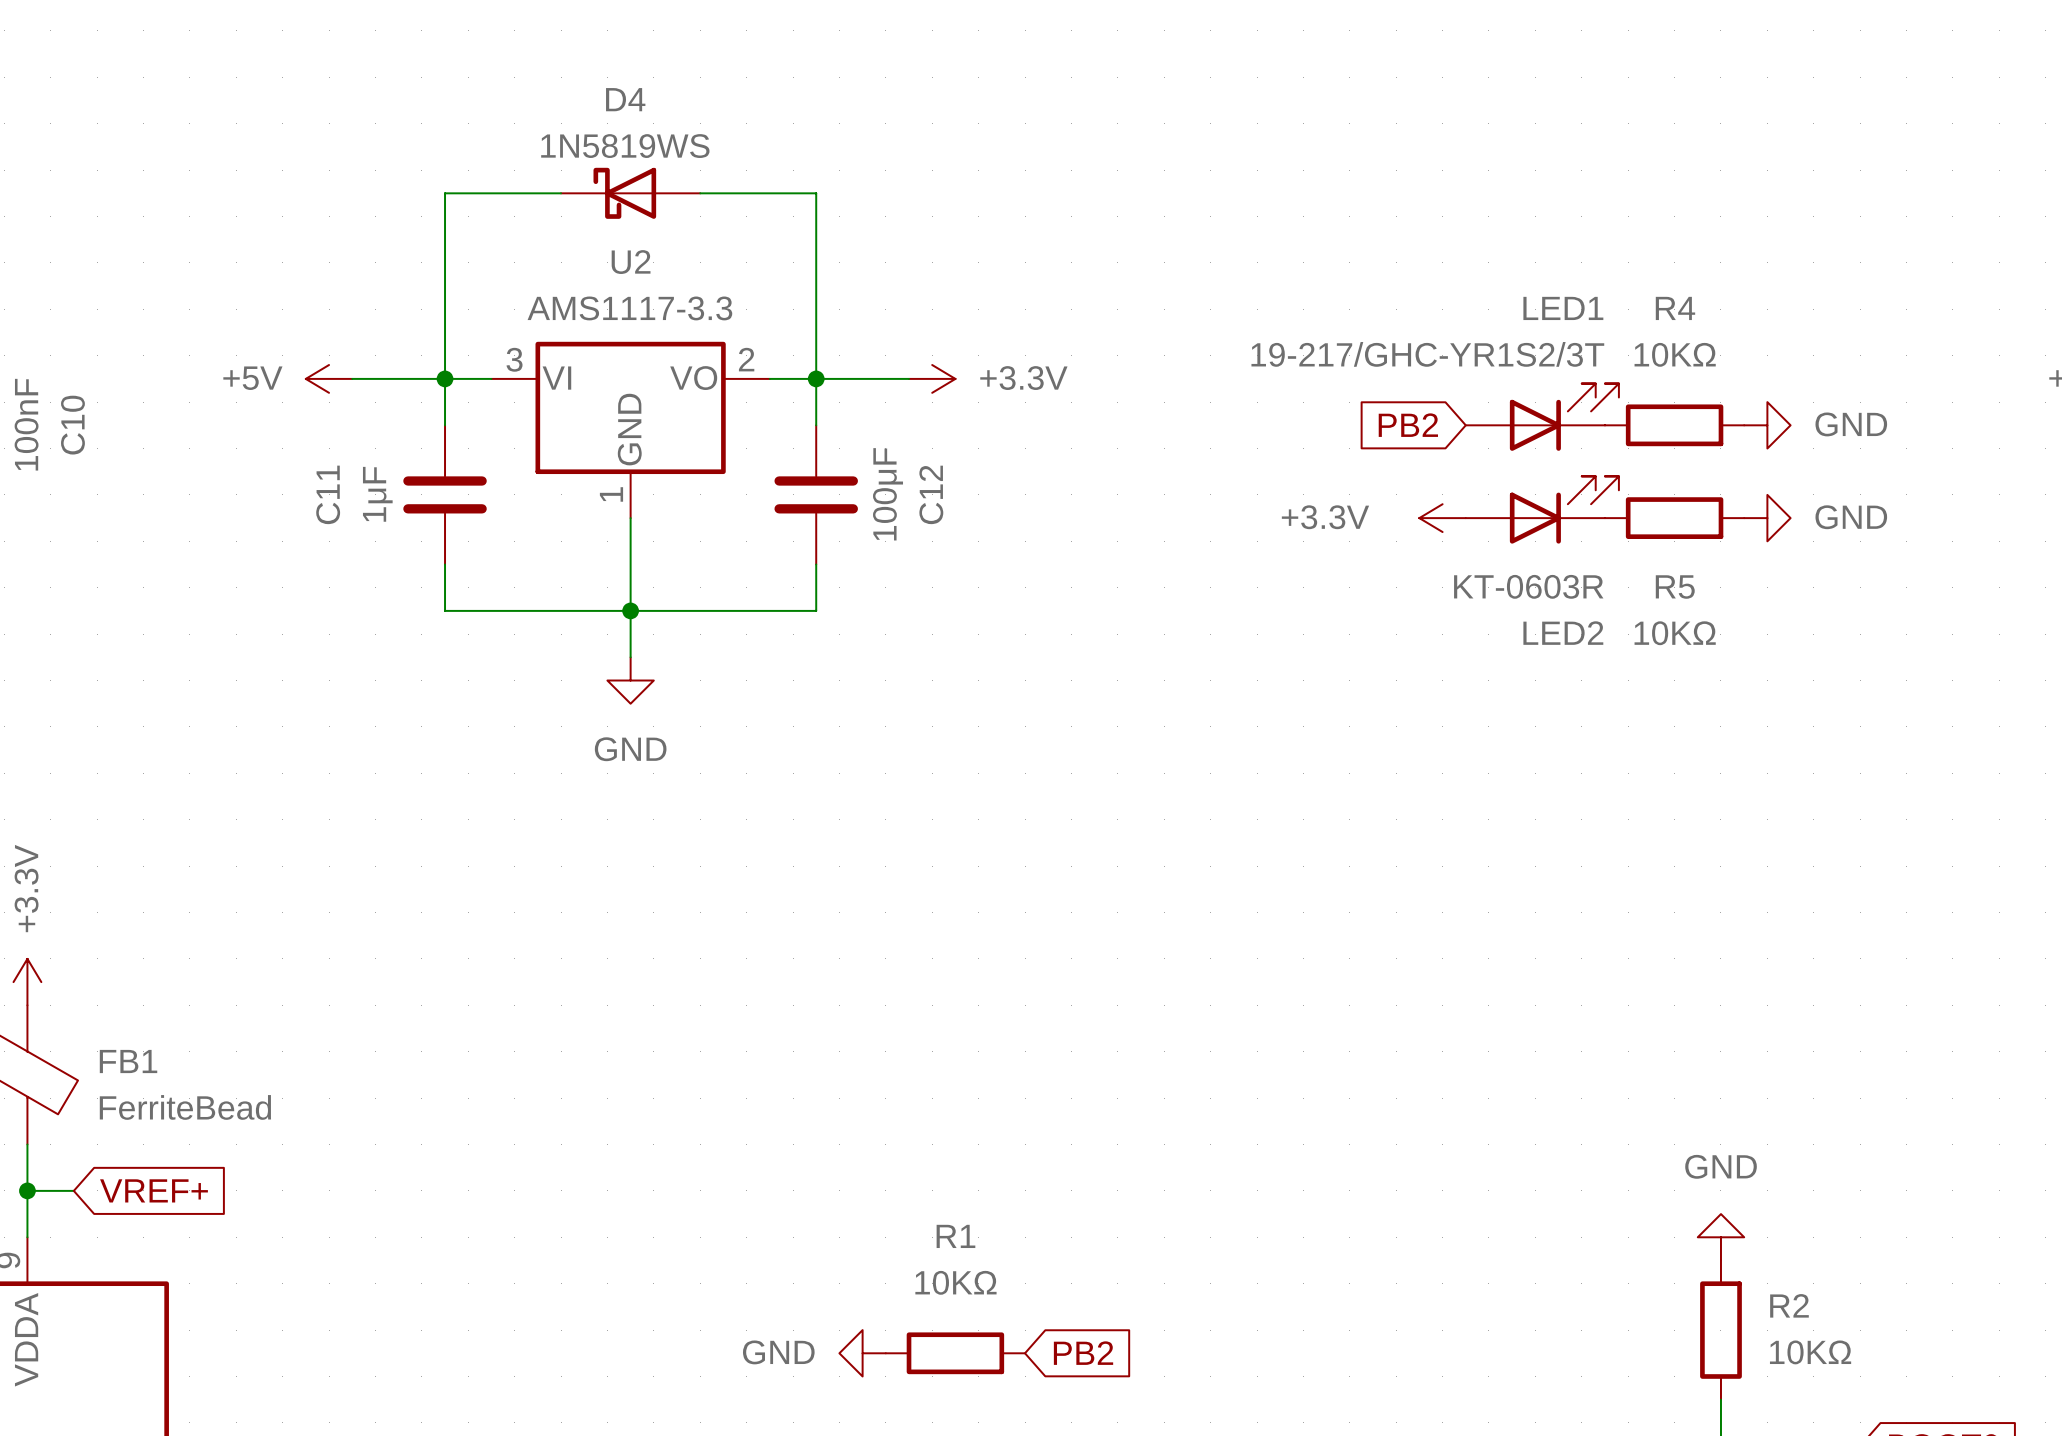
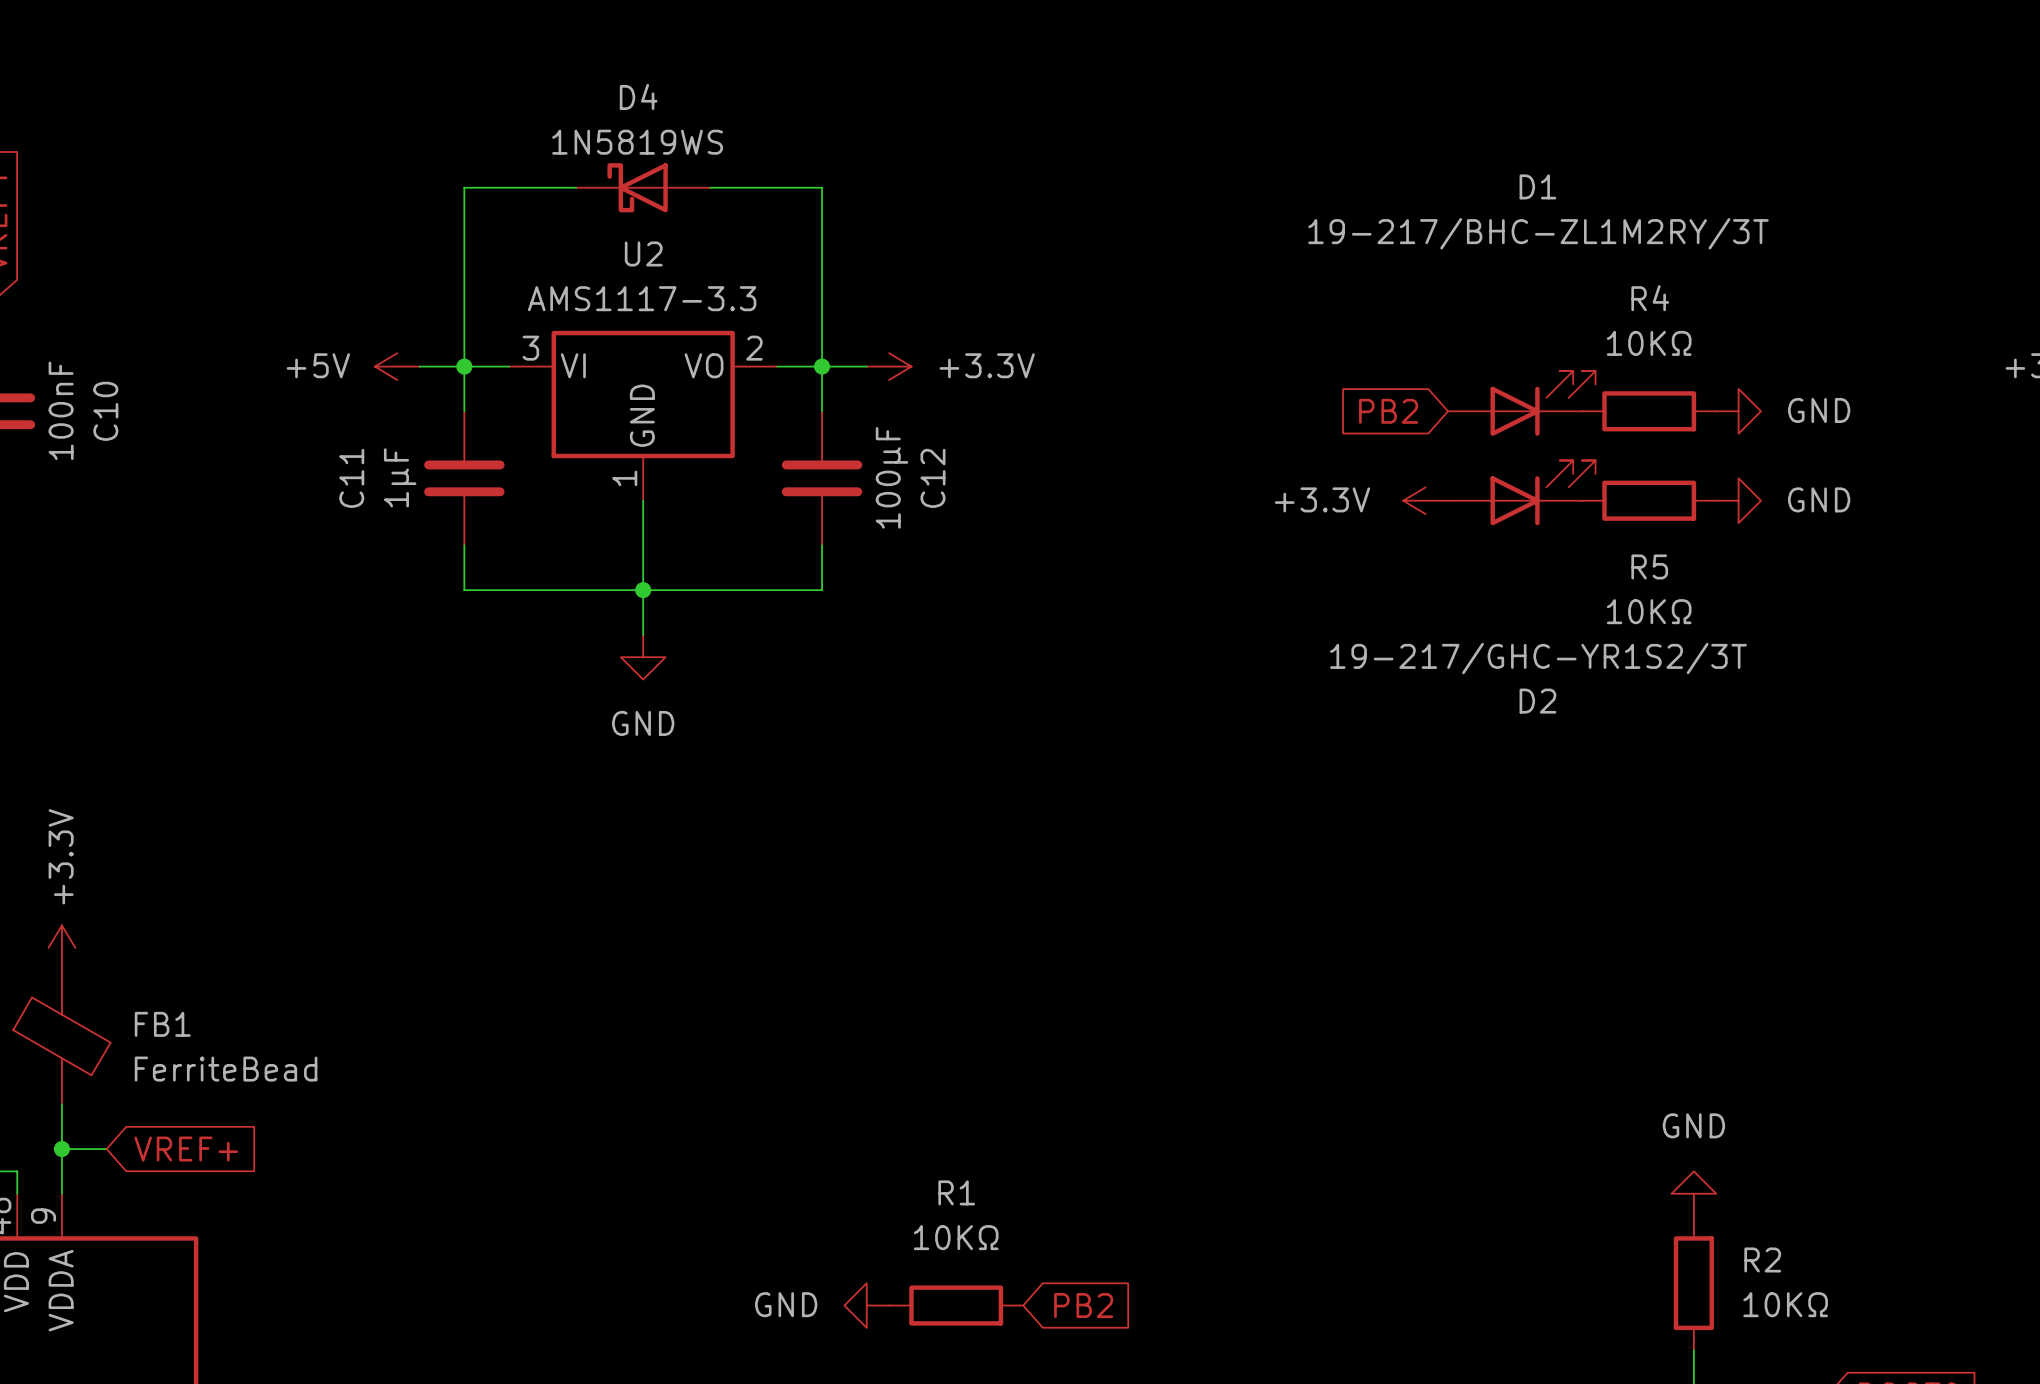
LED1 name: LED1 (1563, 308) -> D1 (1537, 186)
LED1 value: 19-217/GHC-YR1S2/3T (1427, 354) -> 19-217/BHC-ZL1M2RY/3T (1538, 233)
power symbol position: +5V (329, 378) -> +5V (397, 366)
power symbol position: +3.3V (932, 378) -> +3.3V (889, 366)
LED2 value: KT-0603R (1528, 586) -> 19-217/GHC-YR1S2/3T (1538, 658)
LED2 name: LED2 (1563, 633) -> D2 (1537, 701)

